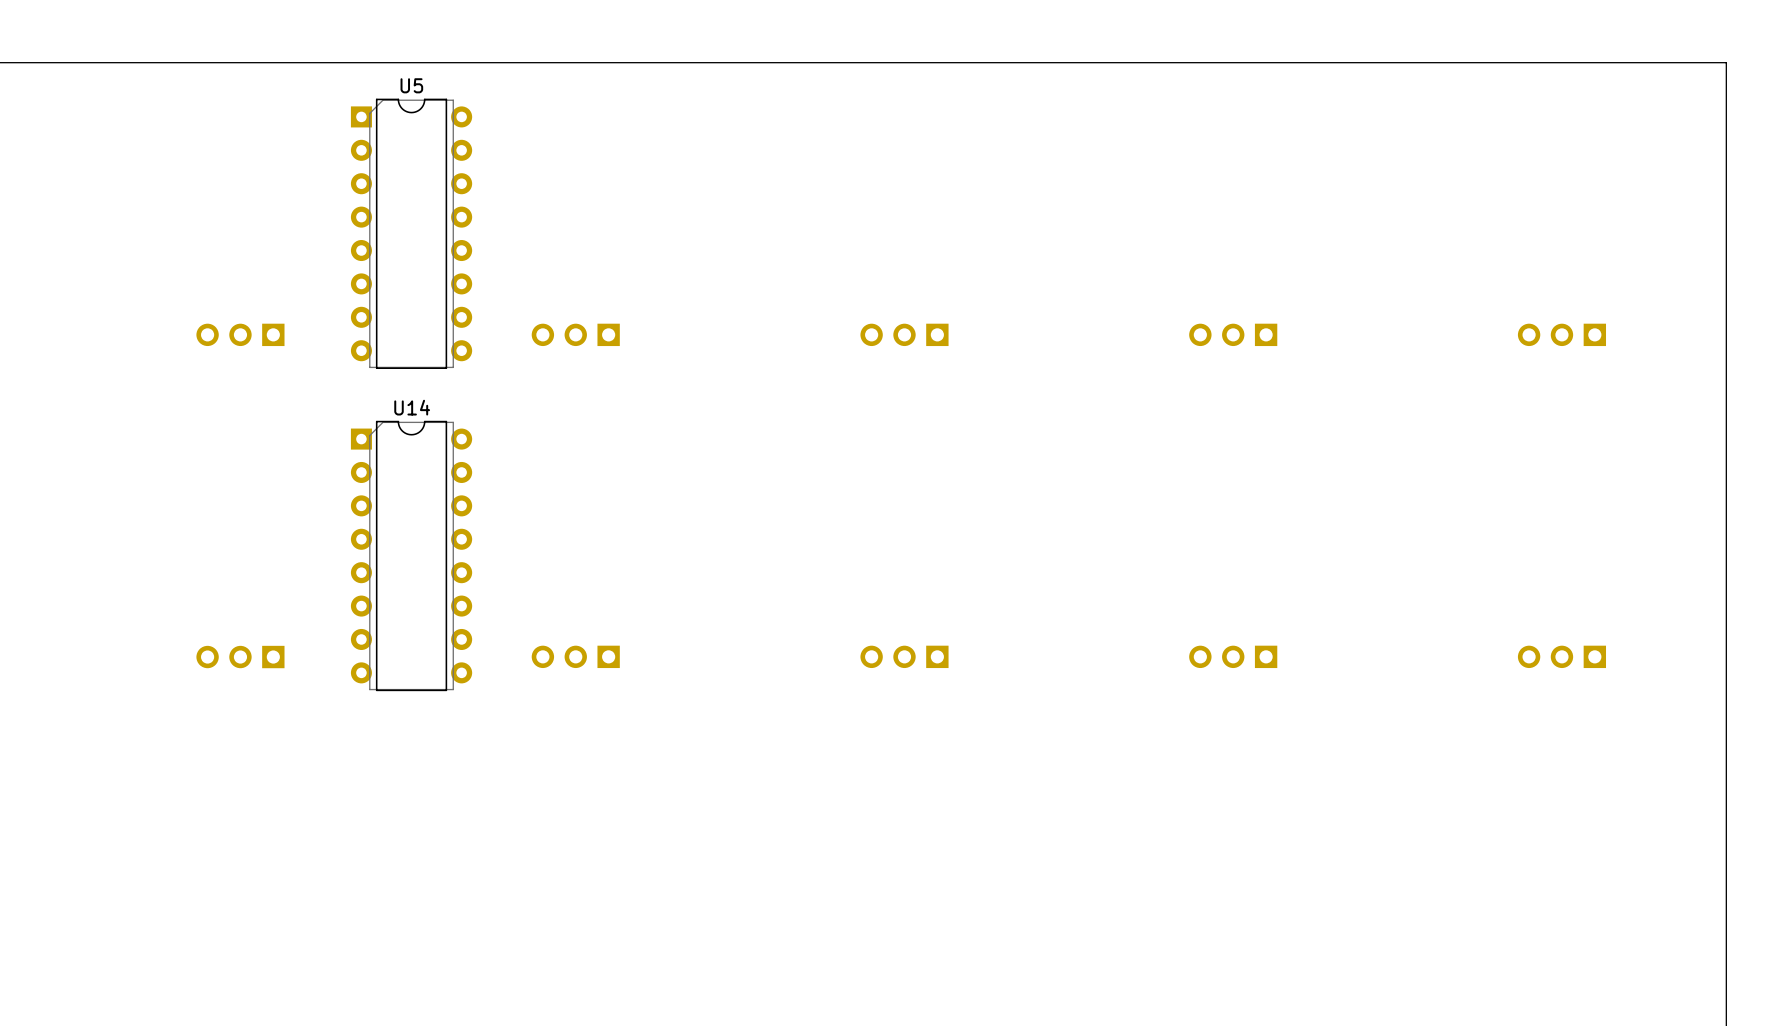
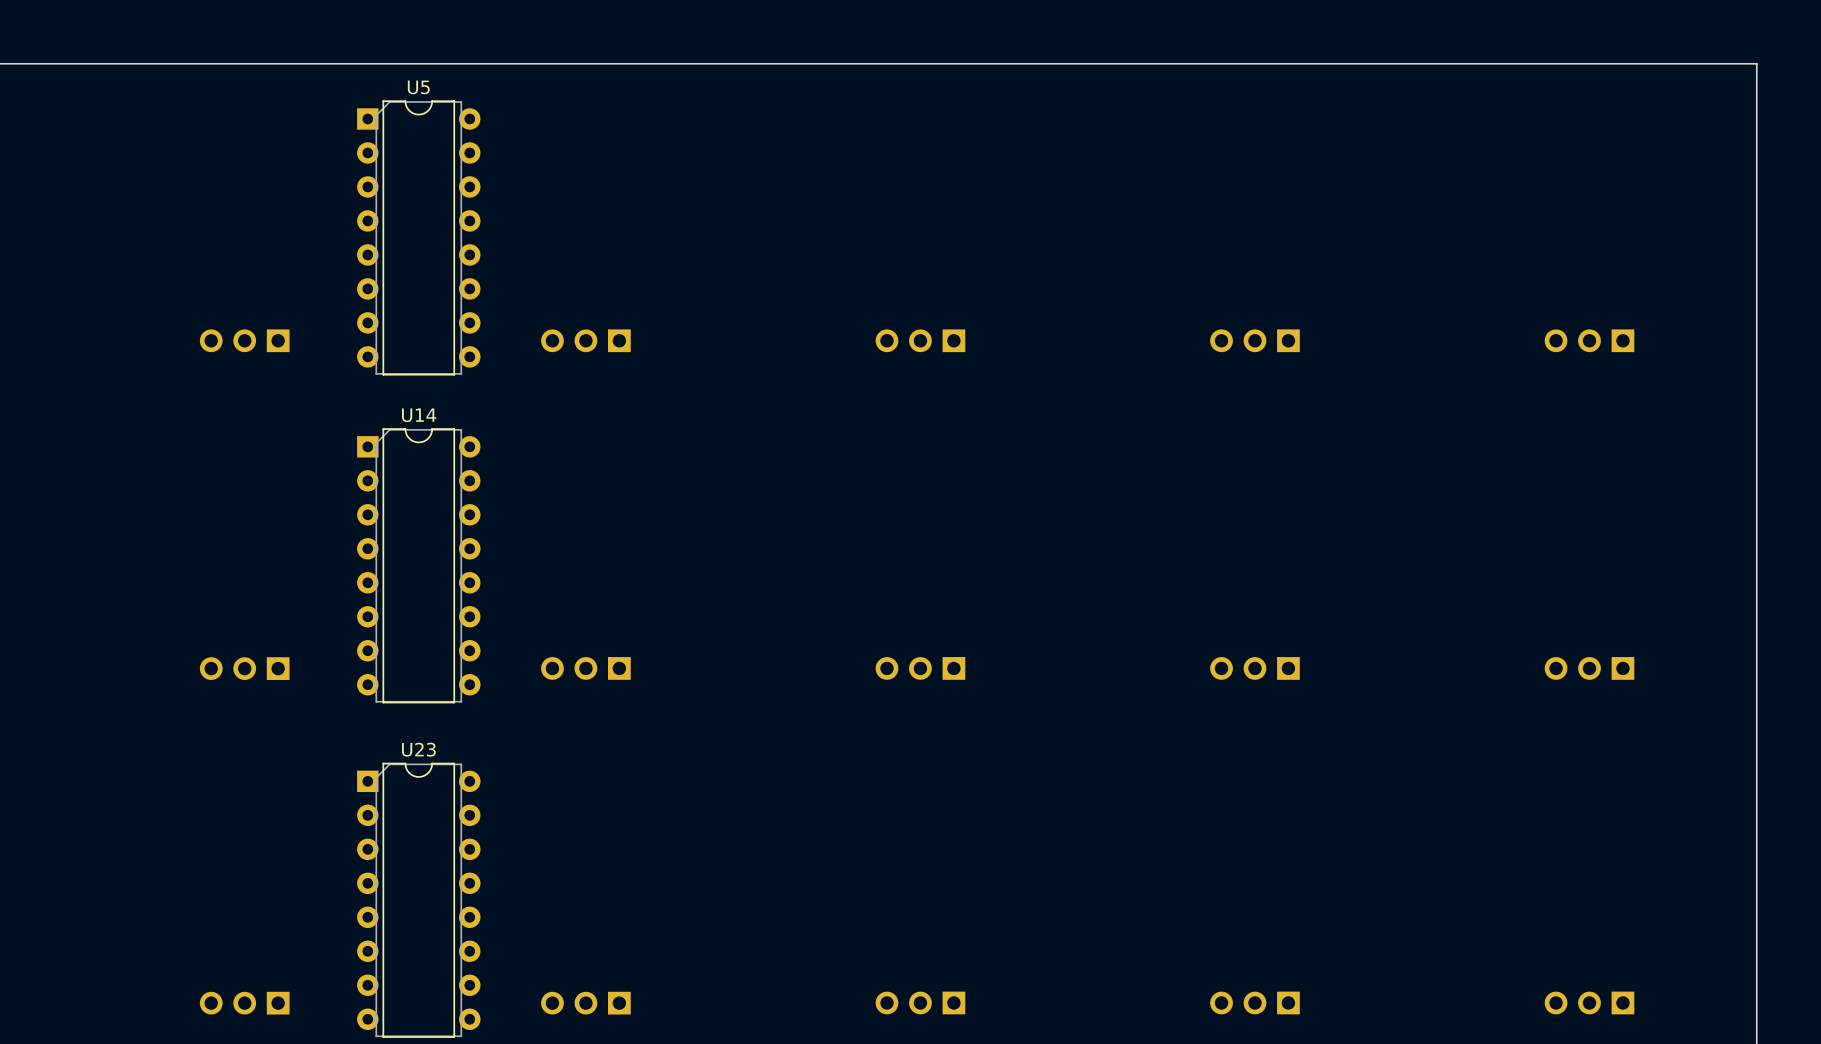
U23: none -> (418, 900)
part: none -> (244, 1003)
part: none -> (585, 1003)
part: none -> (920, 1002)
part: none -> (1254, 1002)
part: none -> (1589, 1002)

